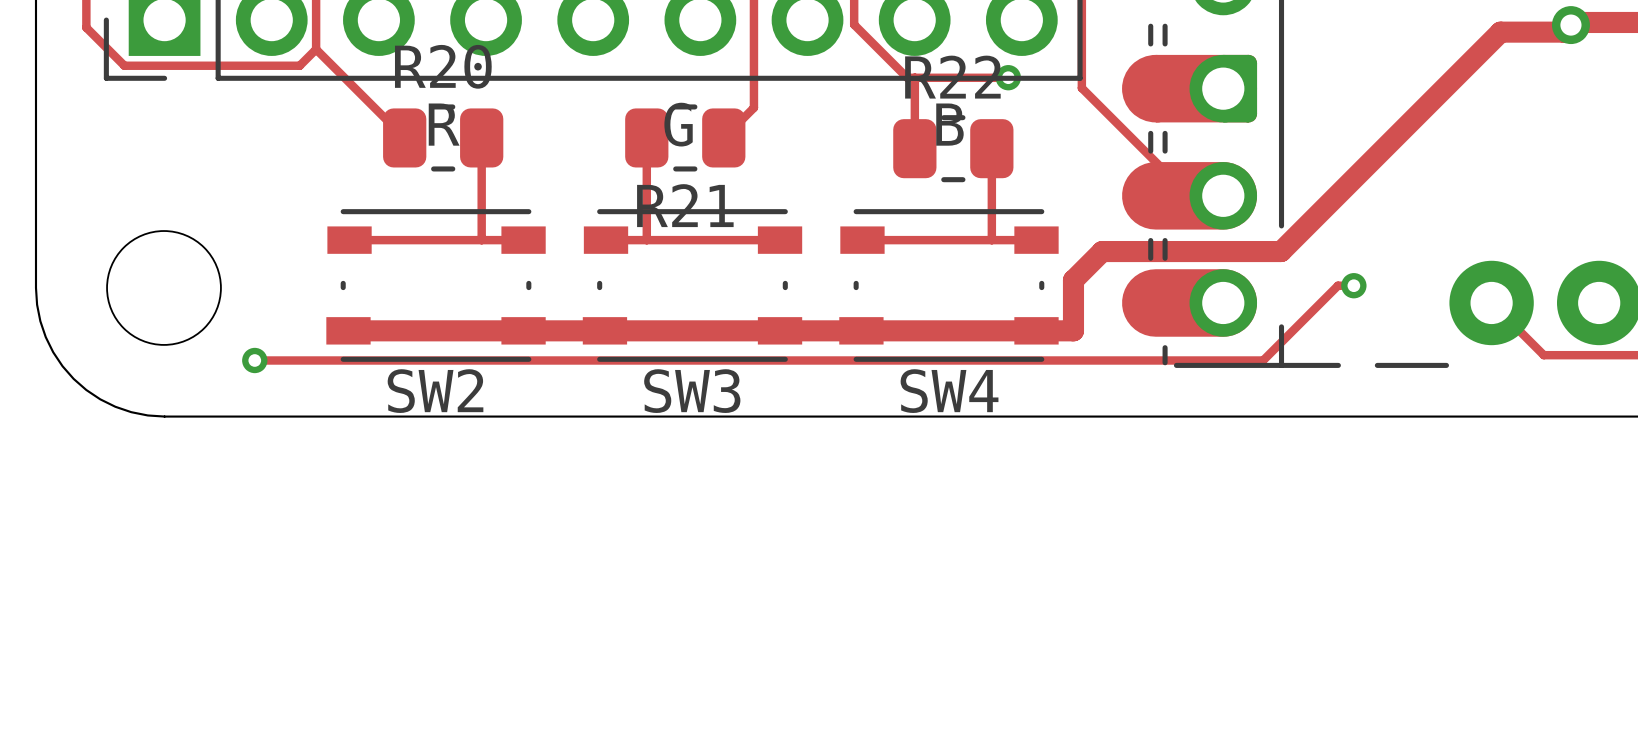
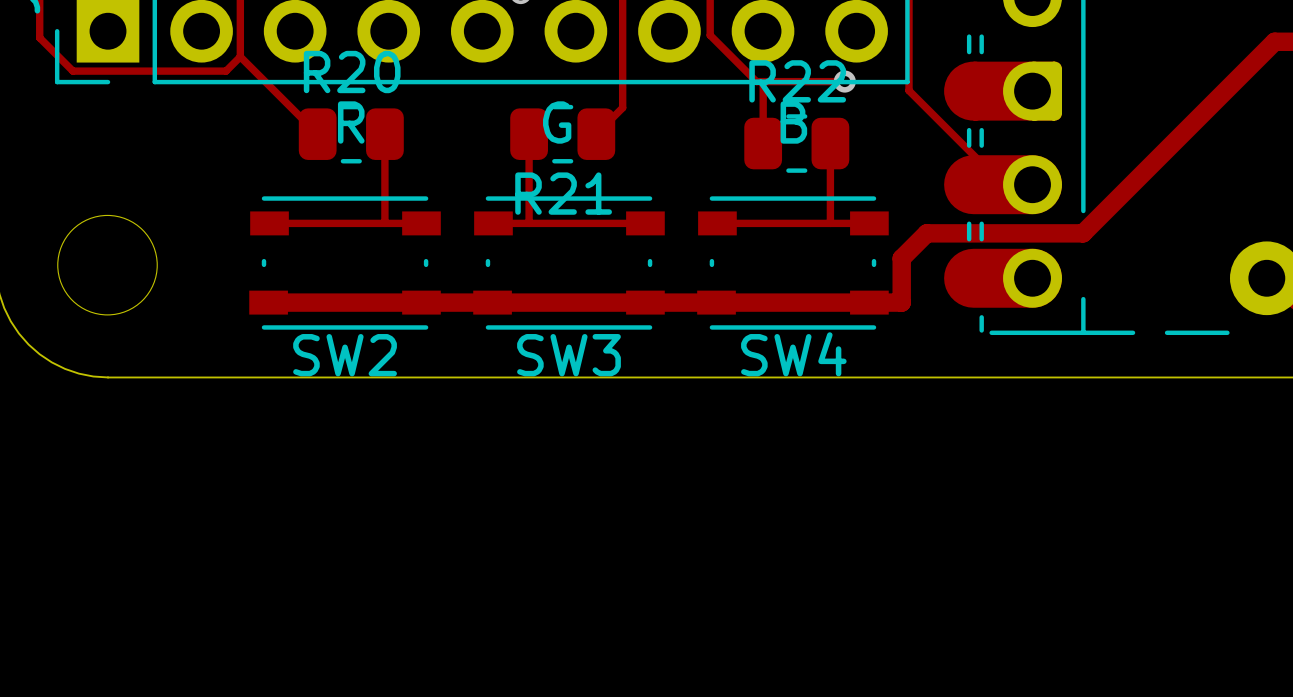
track: (1353, 285) (1337, 285) (1263, 360) (254, 360) -> none
via: (1353, 285) -> none
via: (254, 360) -> none

